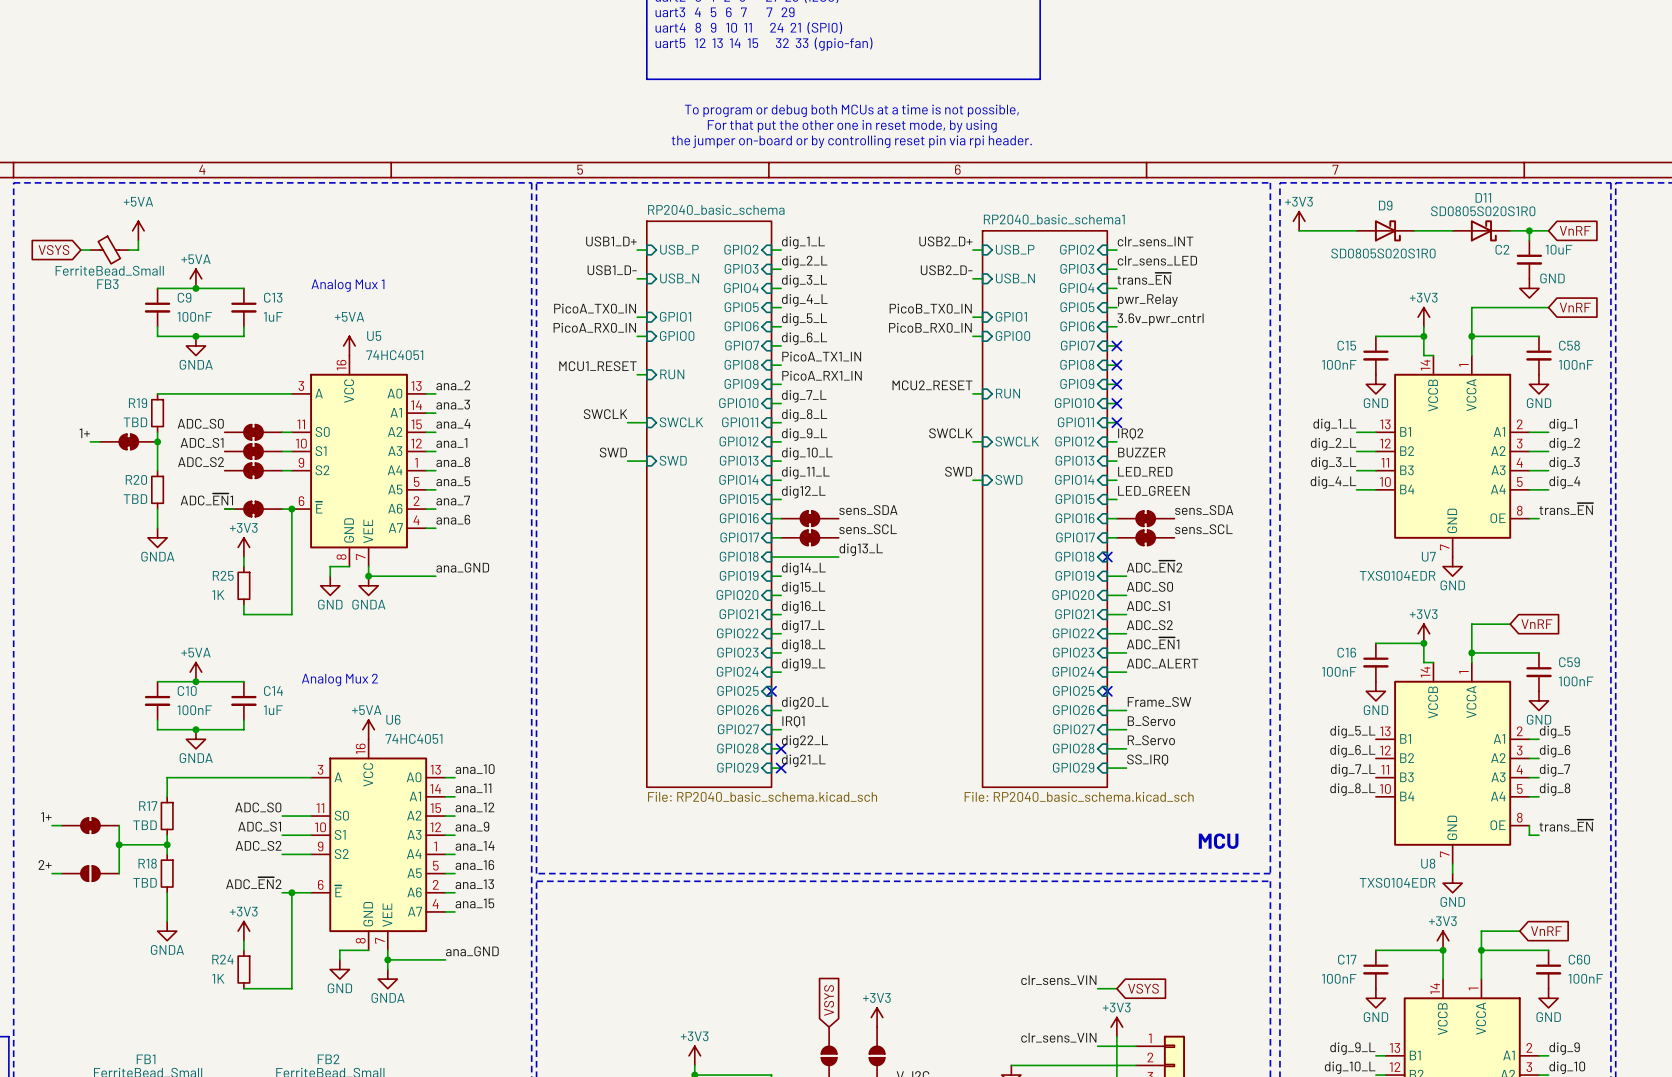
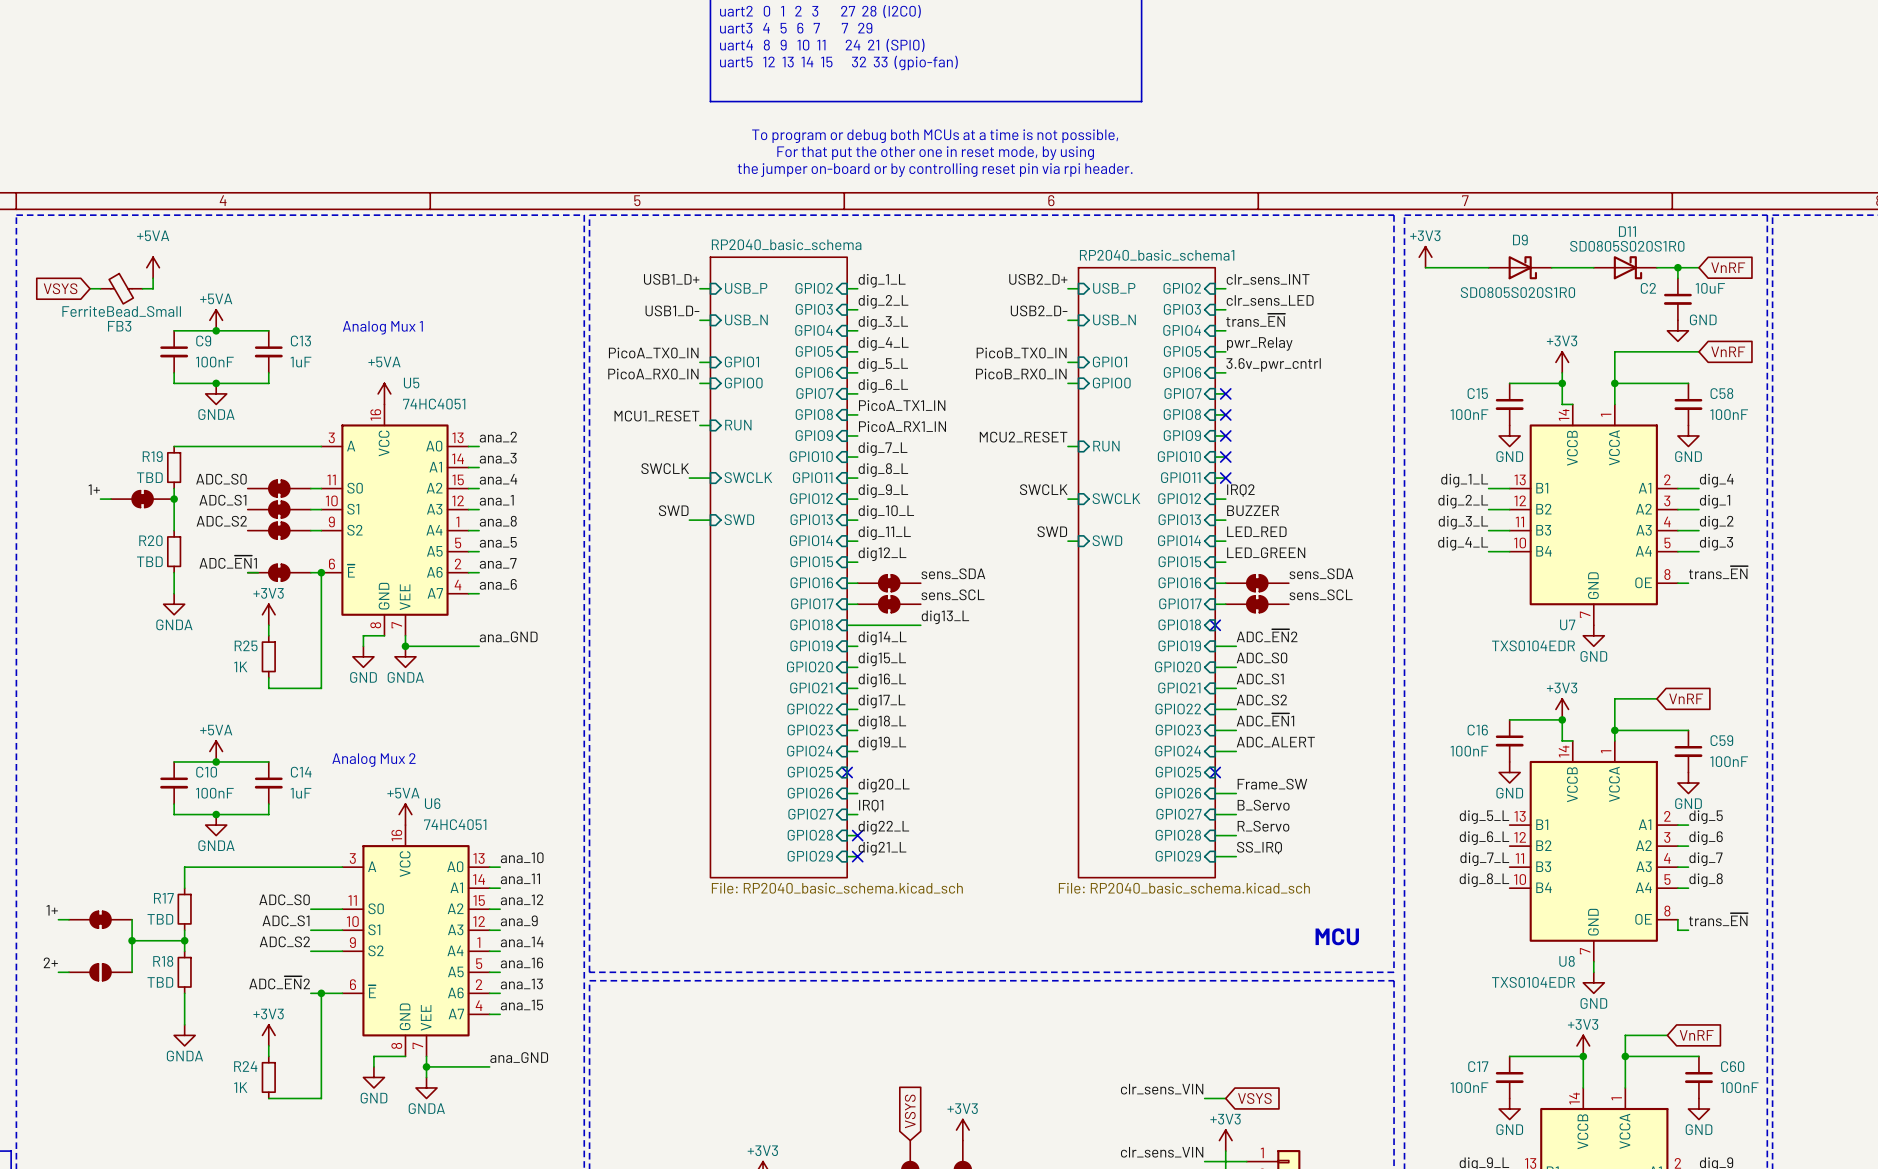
label: dig_1 (1563, 425) -> dig_4 (1716, 480)
label: dig_2 (1564, 444) -> dig_1 (1715, 501)
label: dig_3 (1564, 463) -> dig_2 (1716, 522)
label: dig_4 (1564, 482) -> dig_3 (1716, 543)

